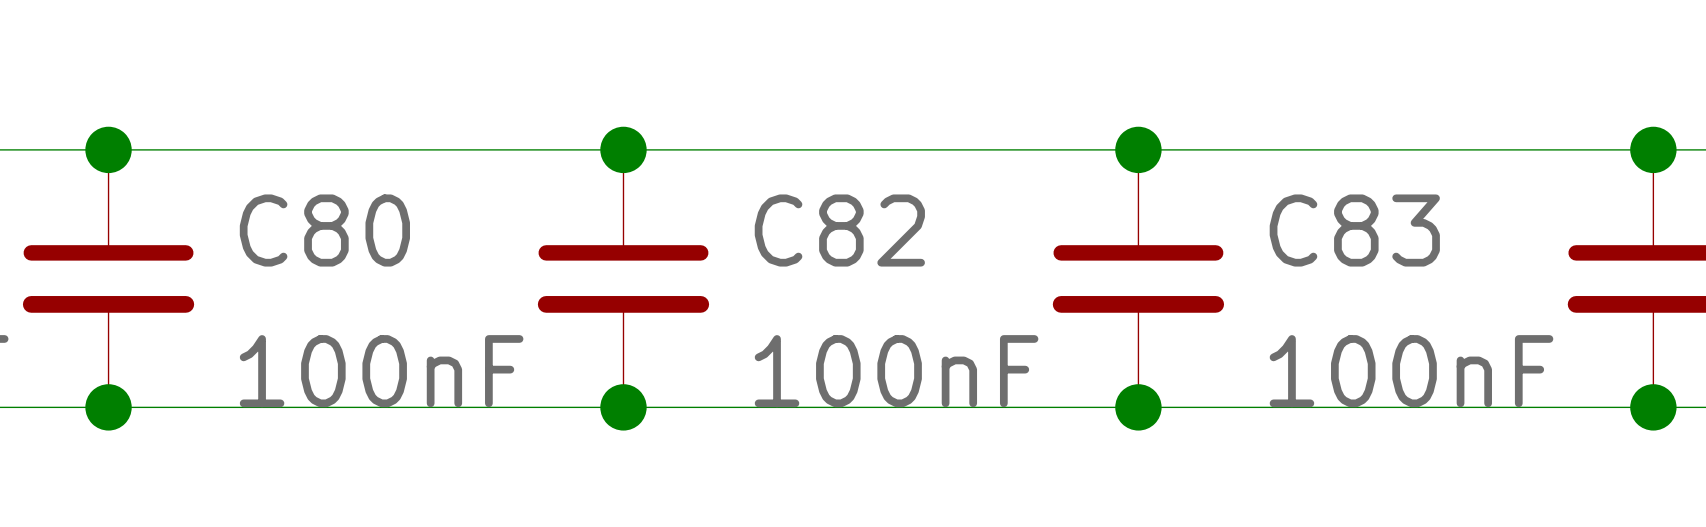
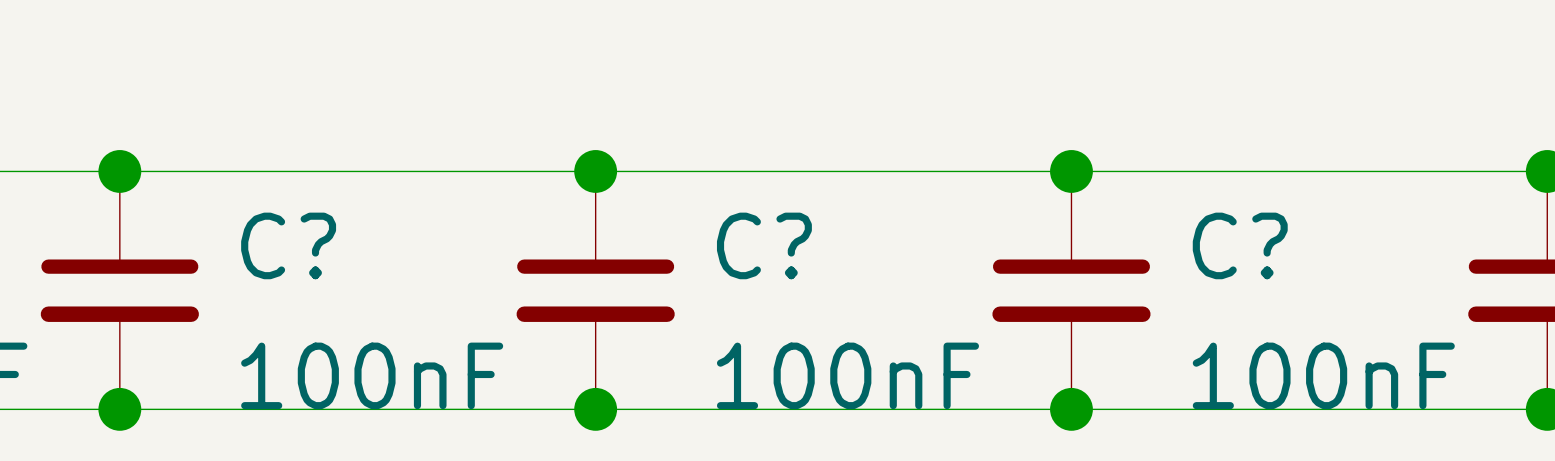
C80 name: C80 (324, 230) -> C? (288, 245)
C82 name: C82 (839, 230) -> C? (764, 245)
C83 name: C83 (1354, 230) -> C? (1240, 245)

